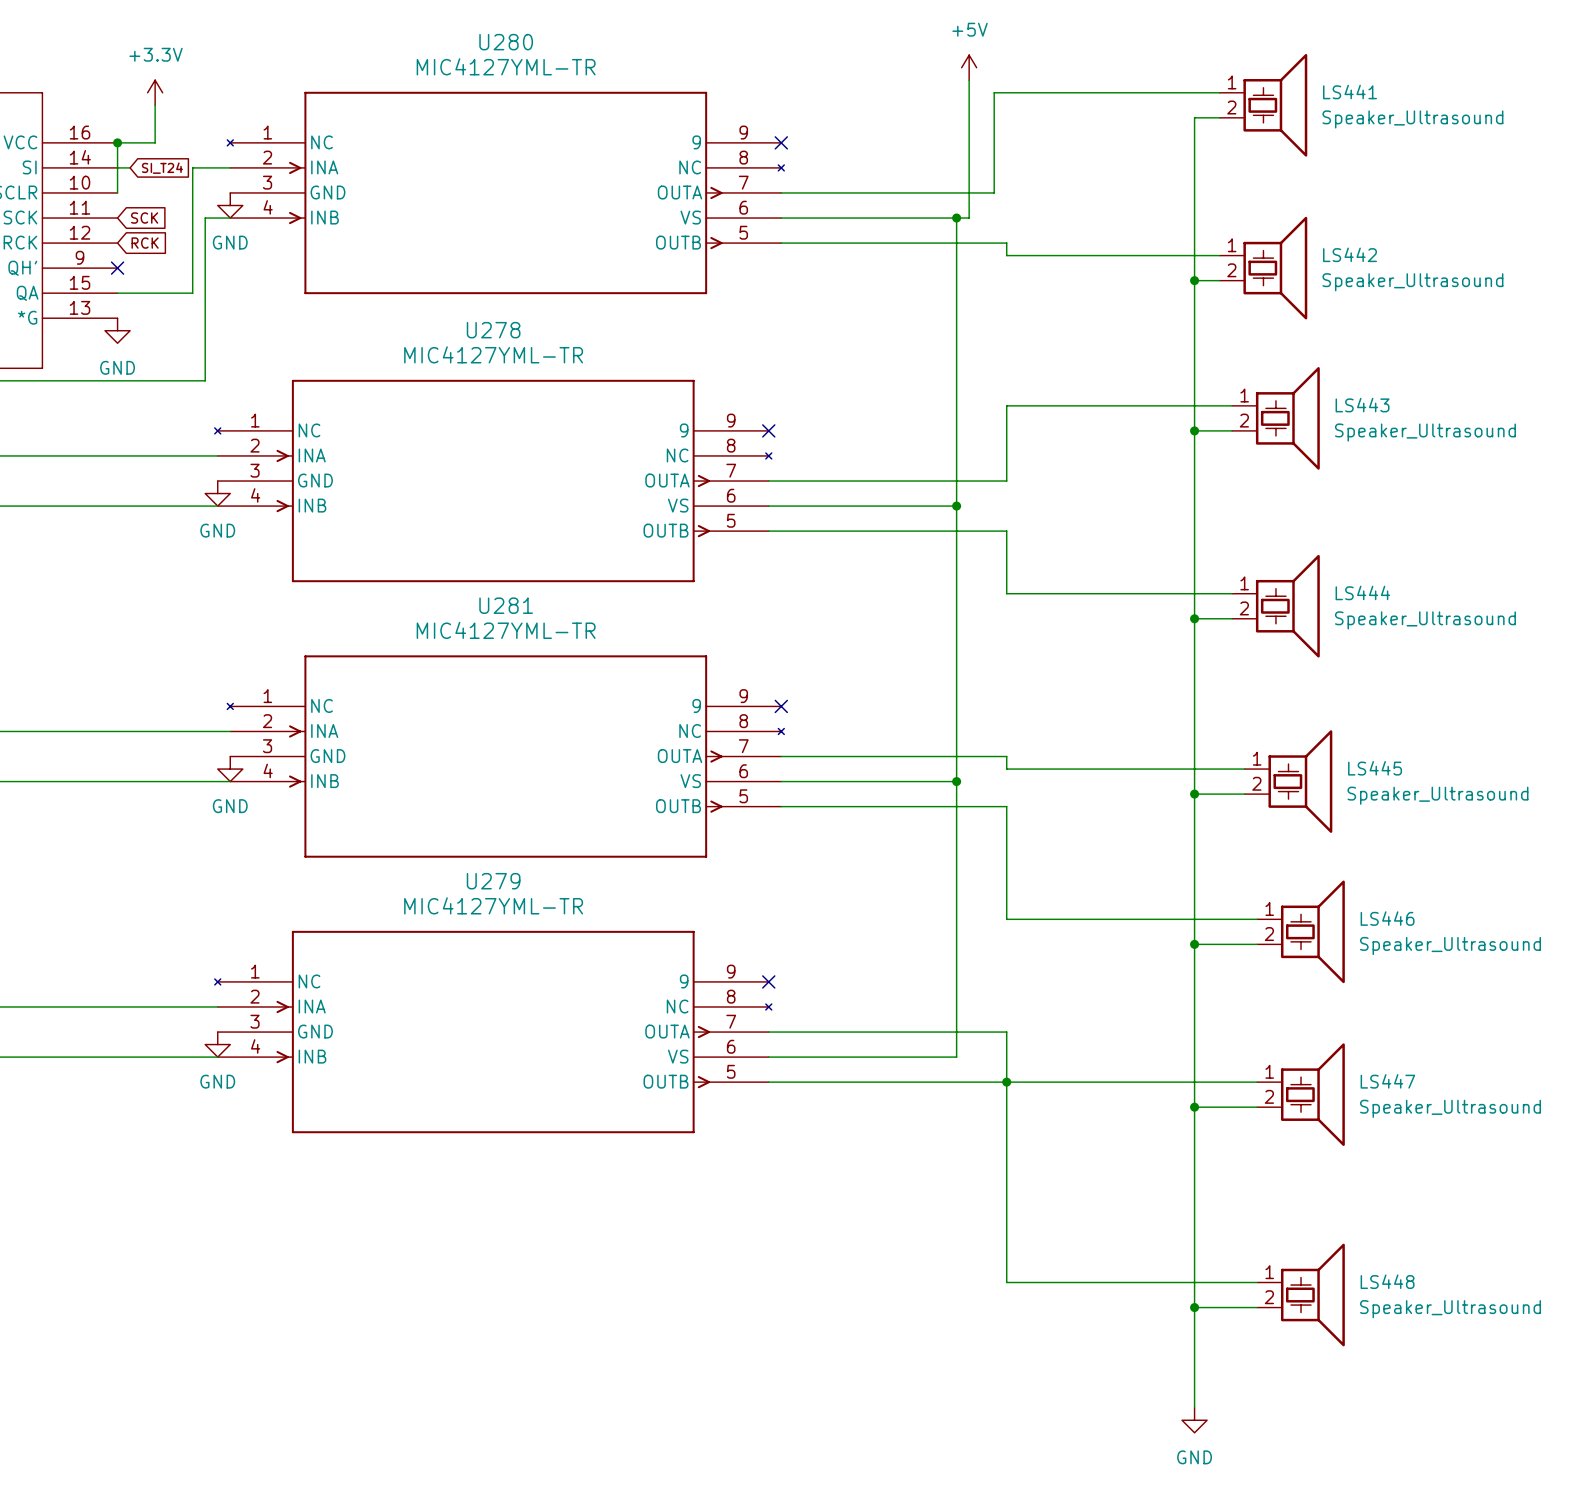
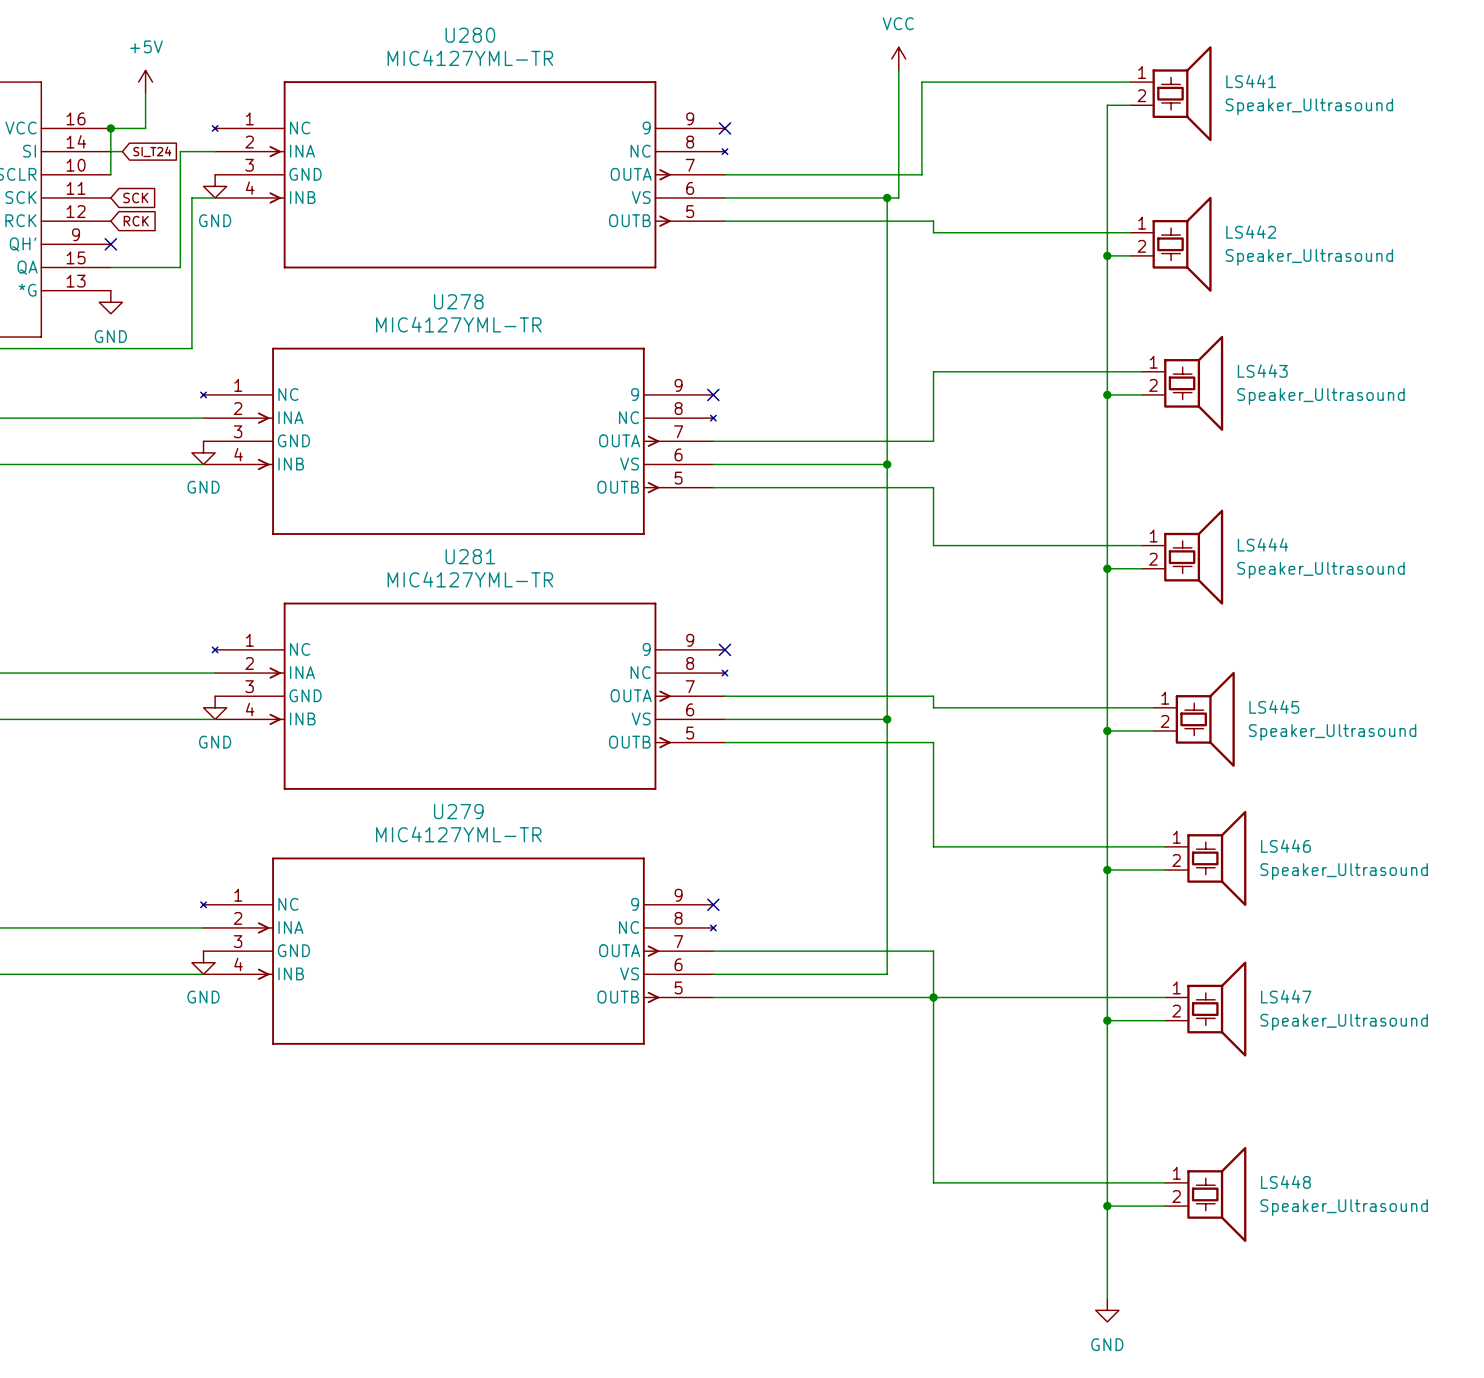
power symbol: +5V (969, 67) -> VCC (898, 58)
power symbol: +3.3V (155, 92) -> +5V (145, 82)

